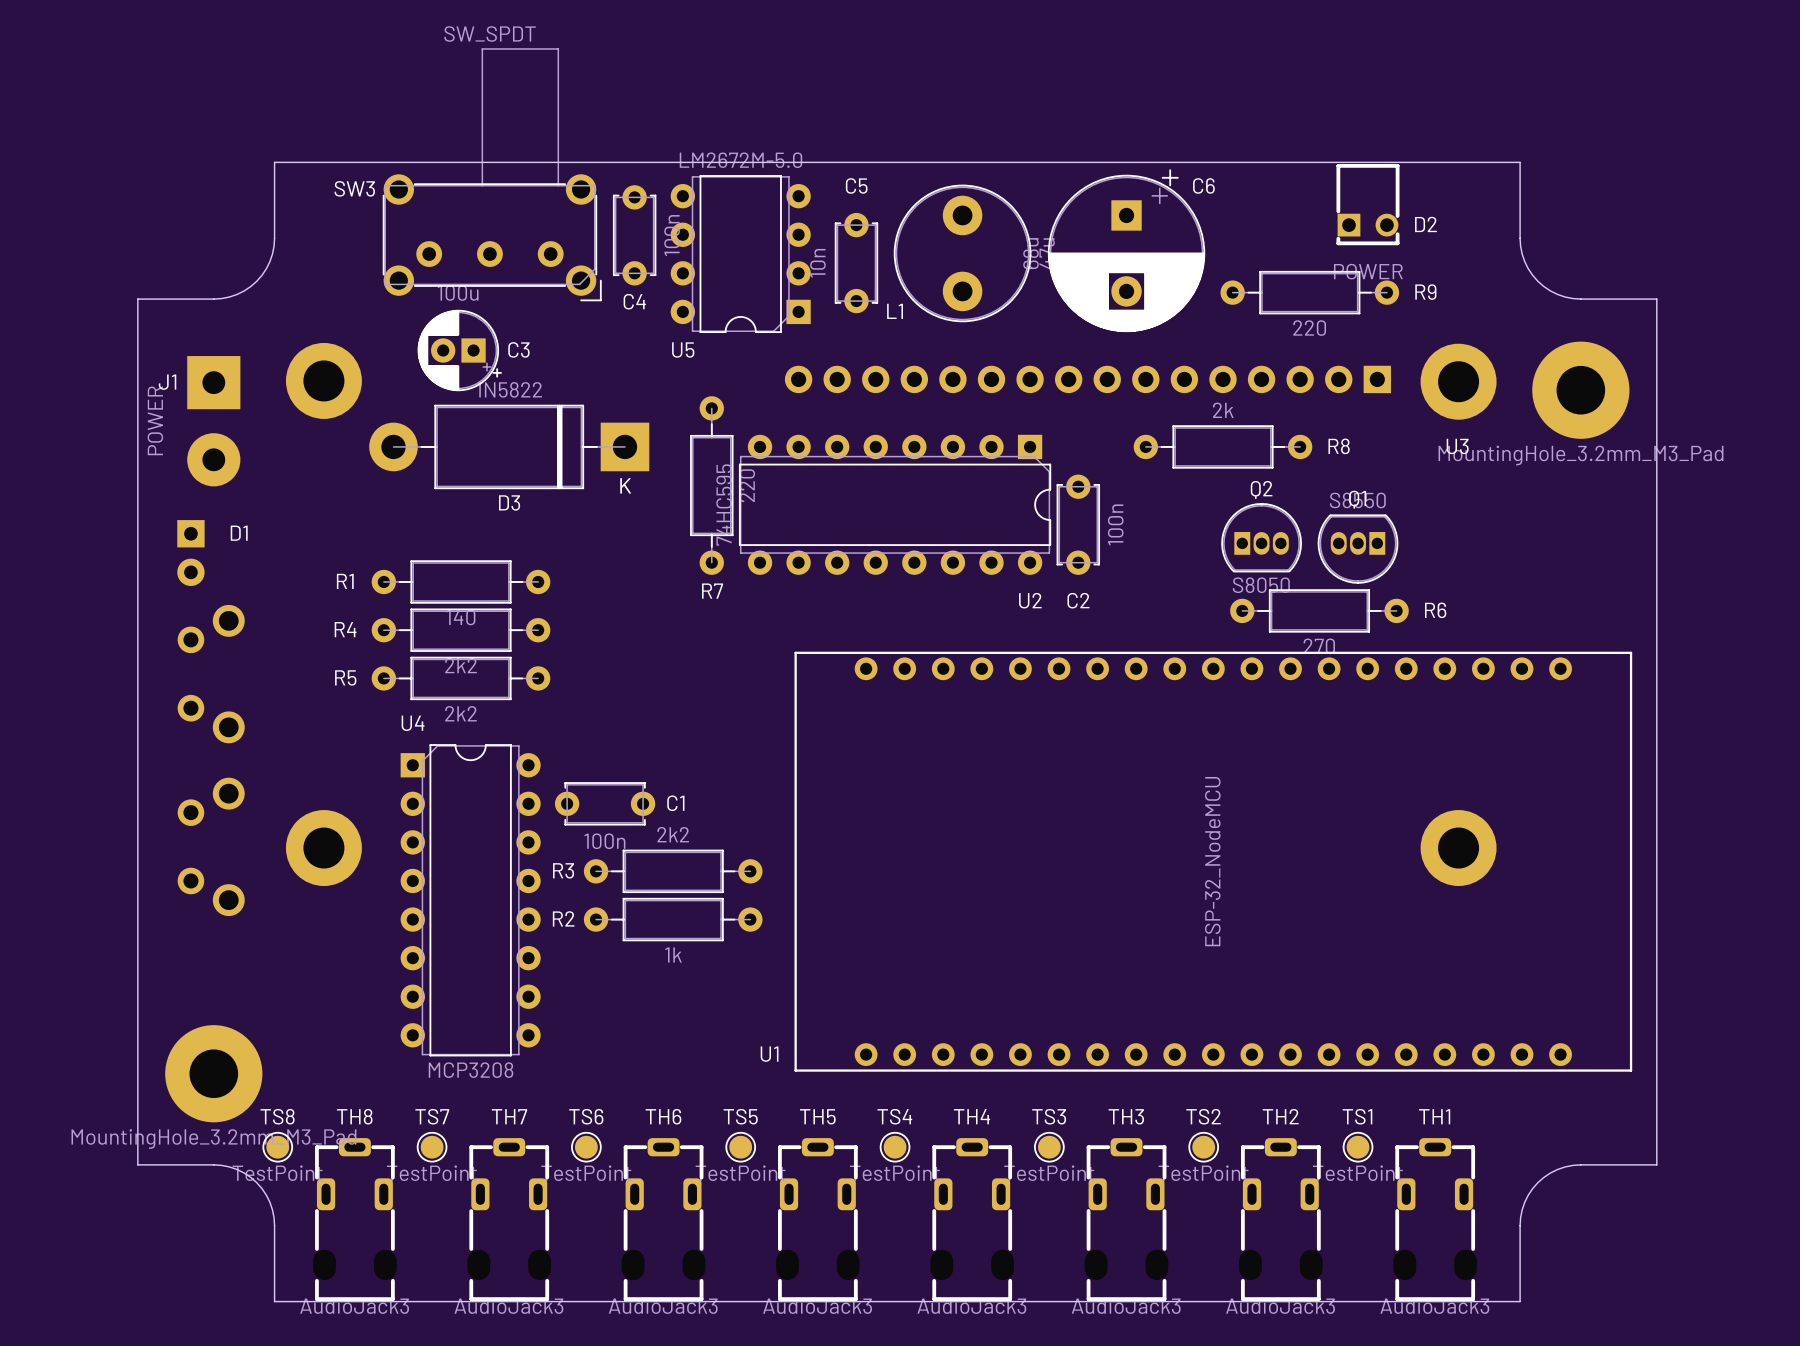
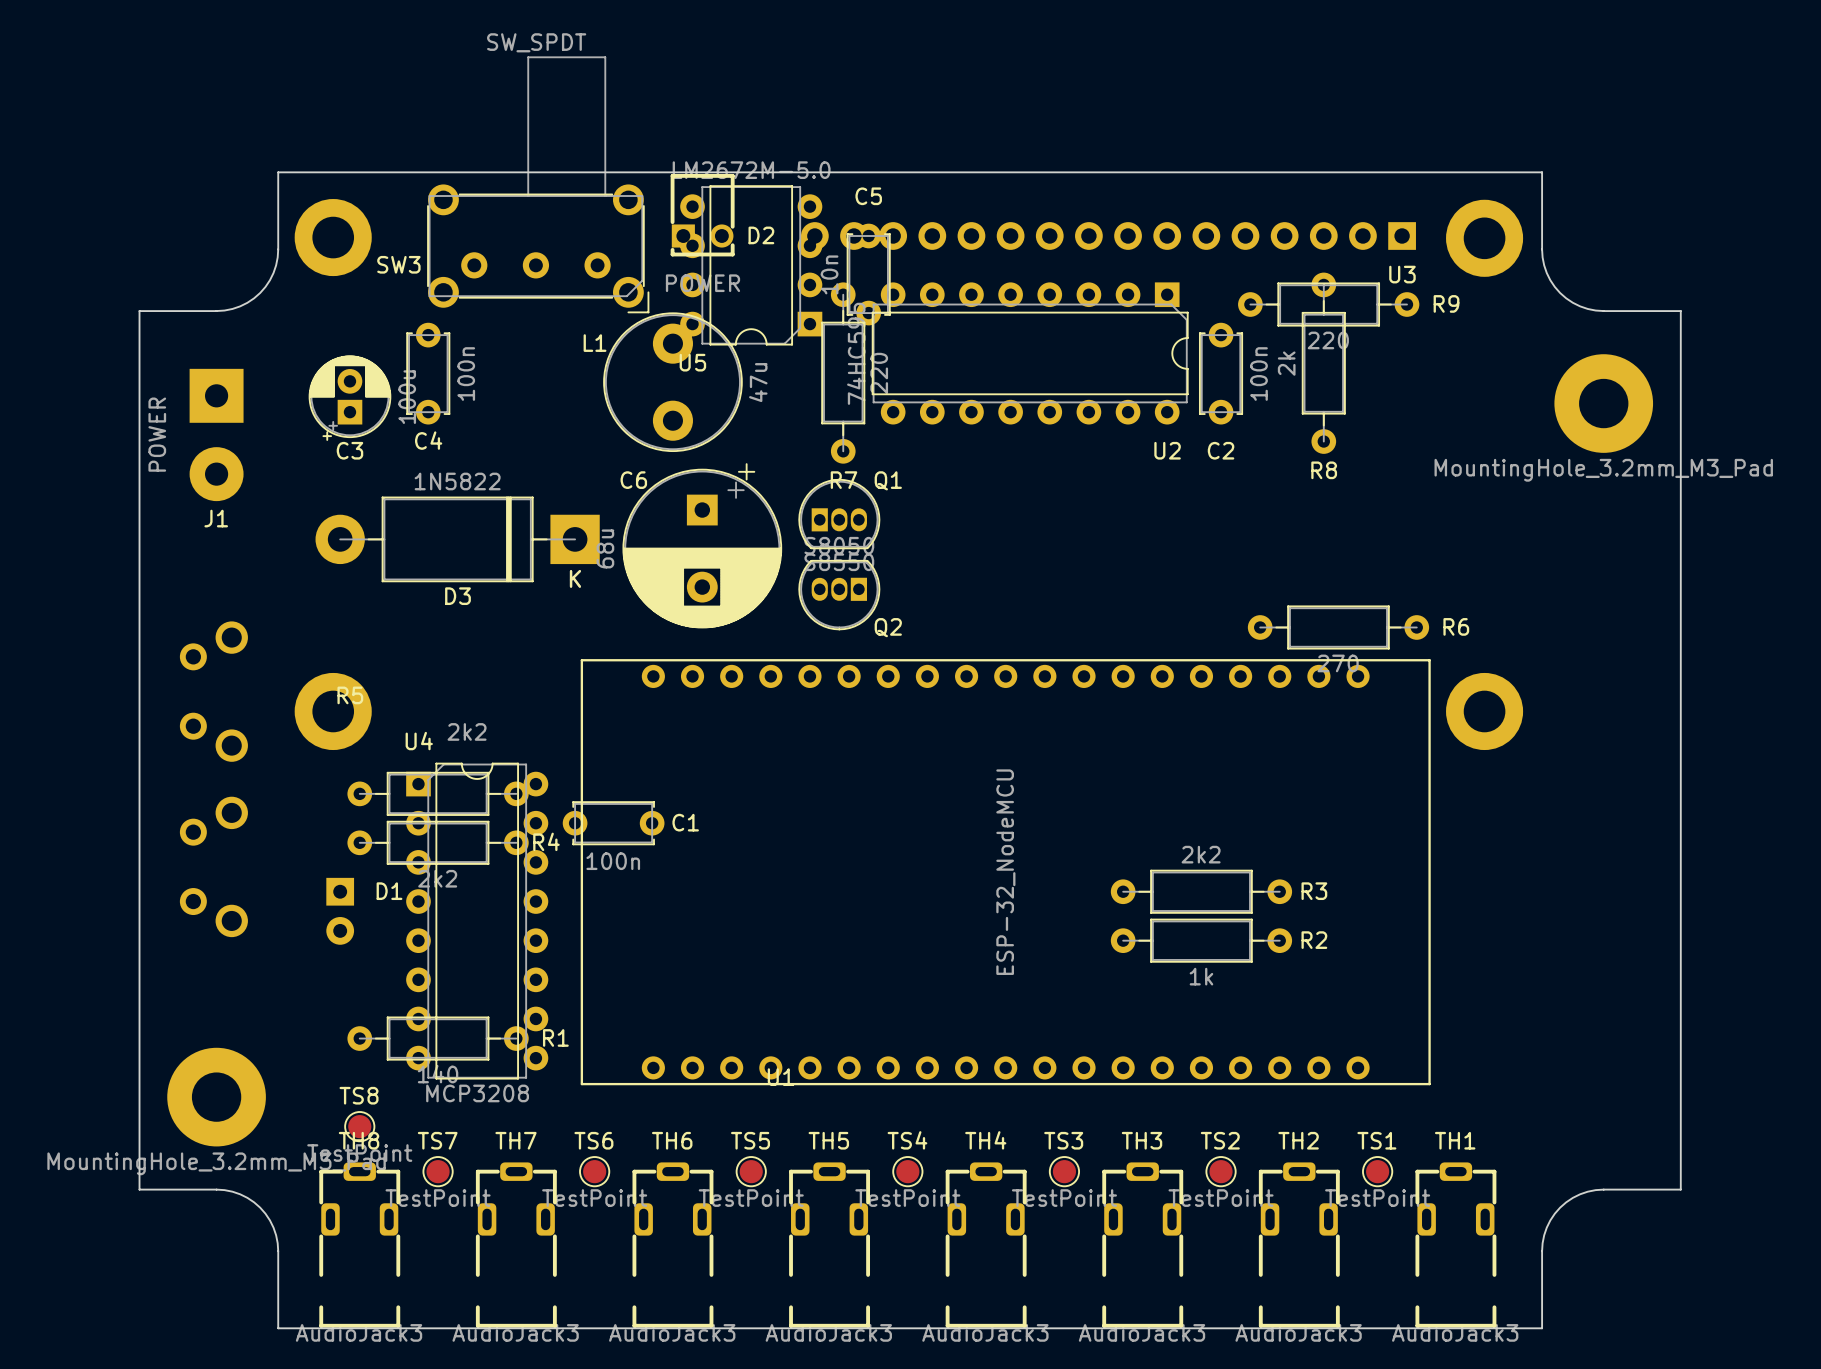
SW3 position: (492, 174) -> (538, 184)
C6 name position: C6 (1203, 185) -> C6 (633, 480)
SW3 name position: SW3 (354, 188) -> SW3 (398, 264)
D2 position: (1367, 204) -> (702, 215)
C4 position: (634, 235) -> (428, 373)
C6 position: (1126, 250) -> (702, 545)
L1 position: (962, 253) -> (672, 382)
L1 name position: L1 (895, 311) -> L1 (595, 343)
C3 rotation: 0° (459, 350) -> 90° clockwise (349, 398)
C3 position: (459, 350) -> (349, 398)
J1 name position: J1 (167, 382) -> J1 (216, 518)
R8 value position: 2k (1223, 410) -> 2k (1286, 363)
D3 position: (509, 446) -> (457, 539)
R8 rotation: 0° (1222, 446) -> 90° clockwise (1323, 363)
R8 position: (1222, 446) -> (1323, 363)
U3 name position: U3 (1457, 446) -> U3 (1402, 274)
R7 position: (711, 485) -> (843, 373)
Q2 name position: Q2 (1261, 489) -> Q2 (888, 627)
Q1 name position: Q1 (1357, 499) -> Q1 (888, 480)
U2 position: (895, 504) -> (1030, 353)
C2 position: (1078, 524) -> (1221, 373)
Q2 rotation: 0° (1261, 537) -> 180° (839, 595)
Q2 position: (1261, 537) -> (839, 595)
Q1 rotation: 0° (1358, 549) -> 180° (839, 514)
Q1 position: (1358, 549) -> (839, 514)
D1 position: (190, 553) -> (340, 911)
R1 name position: R1 (345, 581) -> R1 (555, 1037)
R1 position: (461, 581) -> (438, 1038)
U3 position: (891, 614) -> (908, 474)
R4 name position: R4 (345, 629) -> R4 (546, 841)
R4 position: (461, 630) -> (438, 842)
R5 position: (461, 678) -> (438, 793)
U1 position: (1213, 861) -> (1005, 872)
R3 name position: R3 (563, 870) -> R3 (1314, 891)
R3 position: (673, 871) -> (1201, 891)
R2 name position: R2 (563, 918) -> R2 (1314, 940)
R2 position: (673, 919) -> (1201, 940)
TS8 position: (277, 1147) -> (359, 1126)

